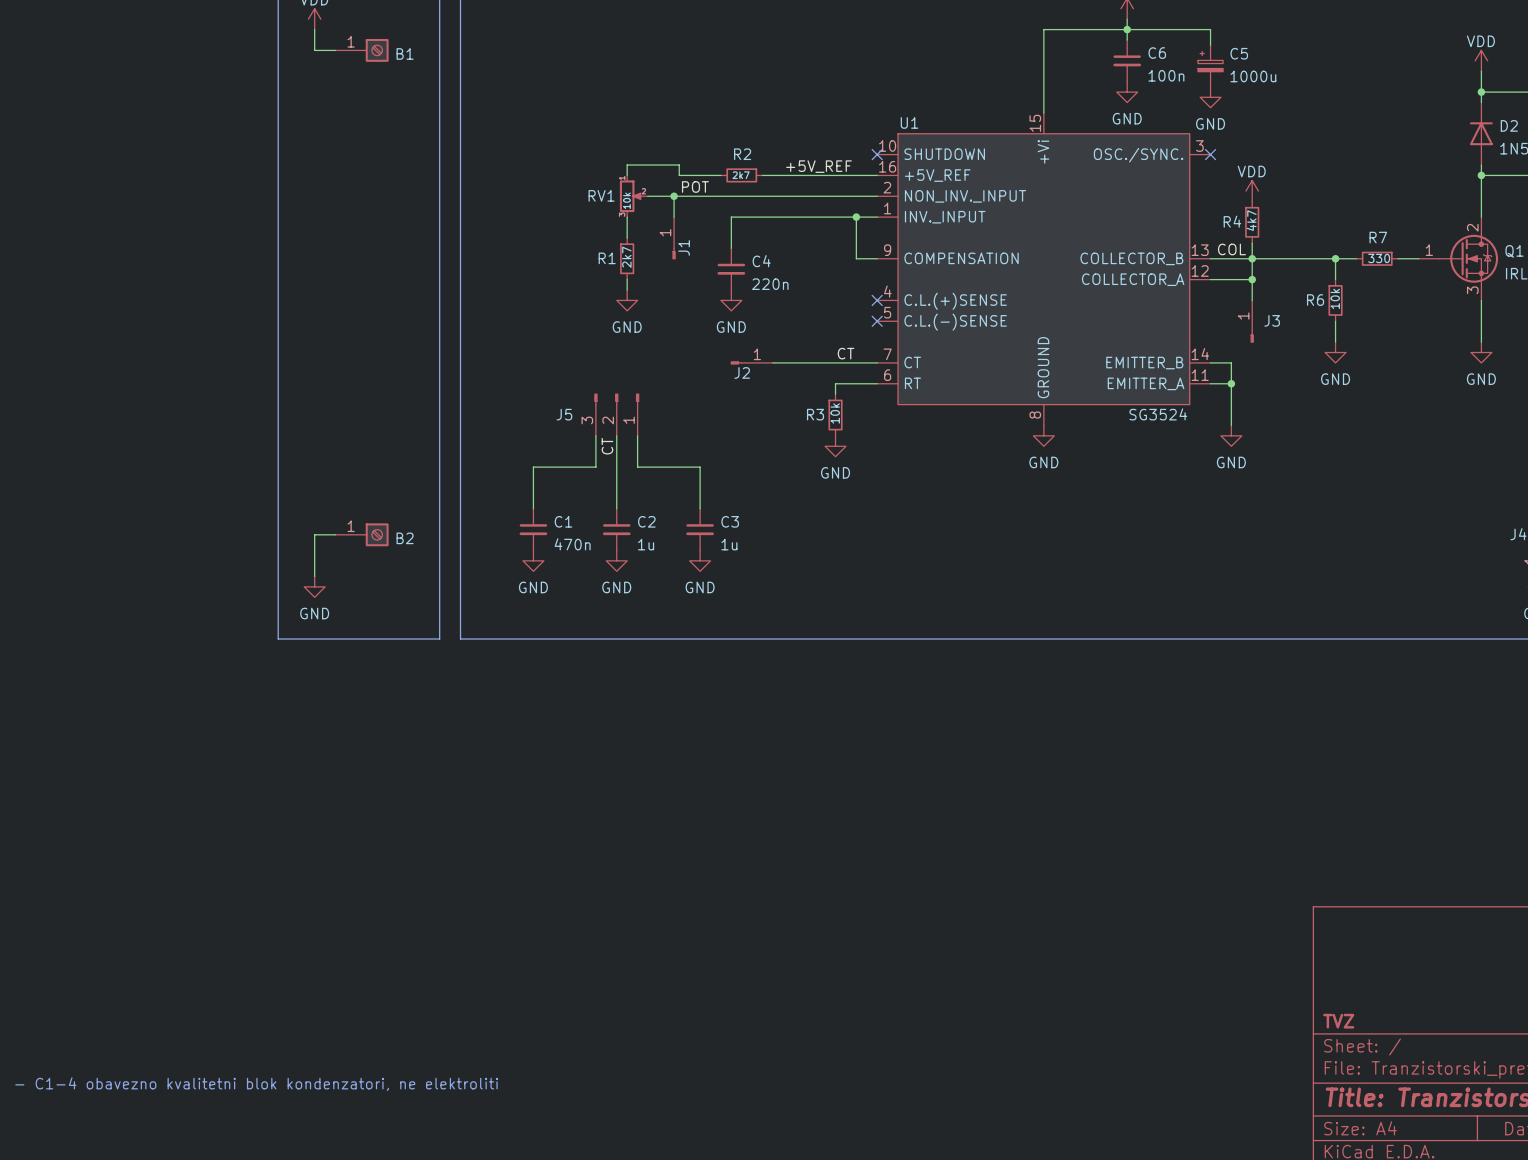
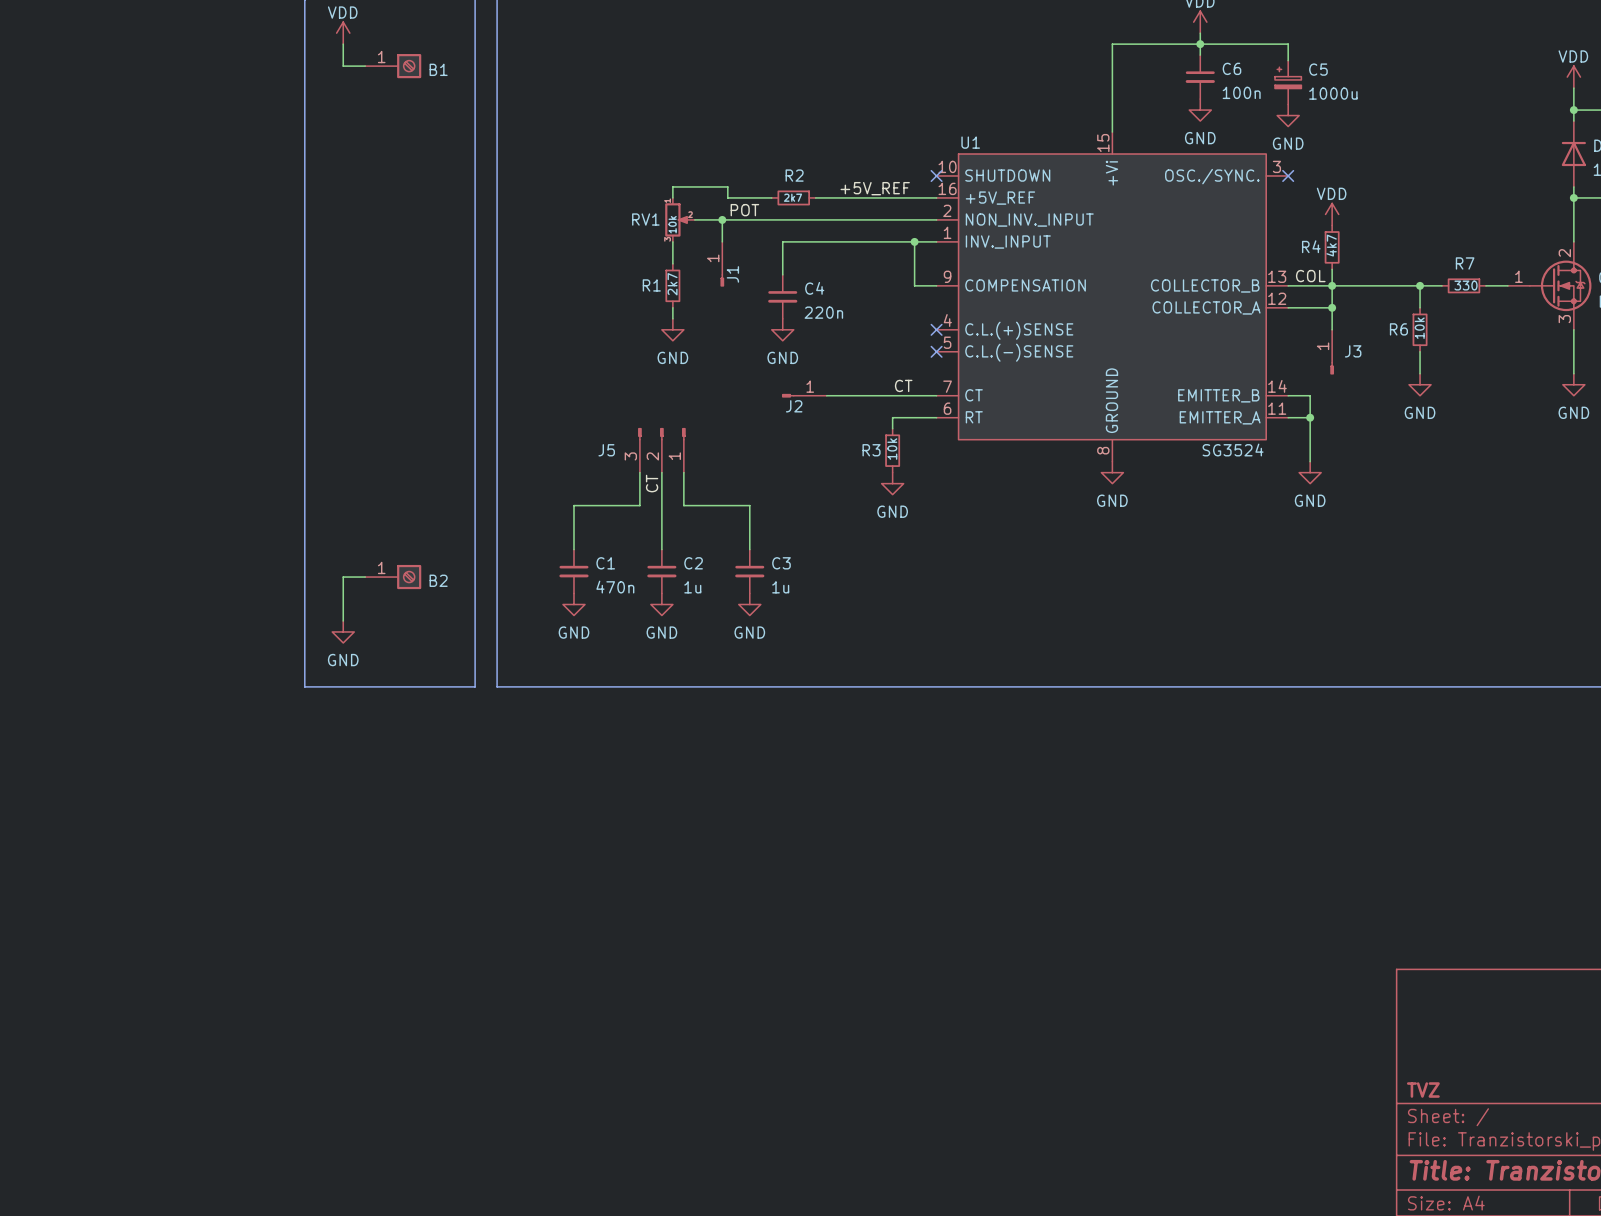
text: - C1-4 obavezno kvalitetni blok kondenzatori, ne elektroliti (256, 1084) -> none

